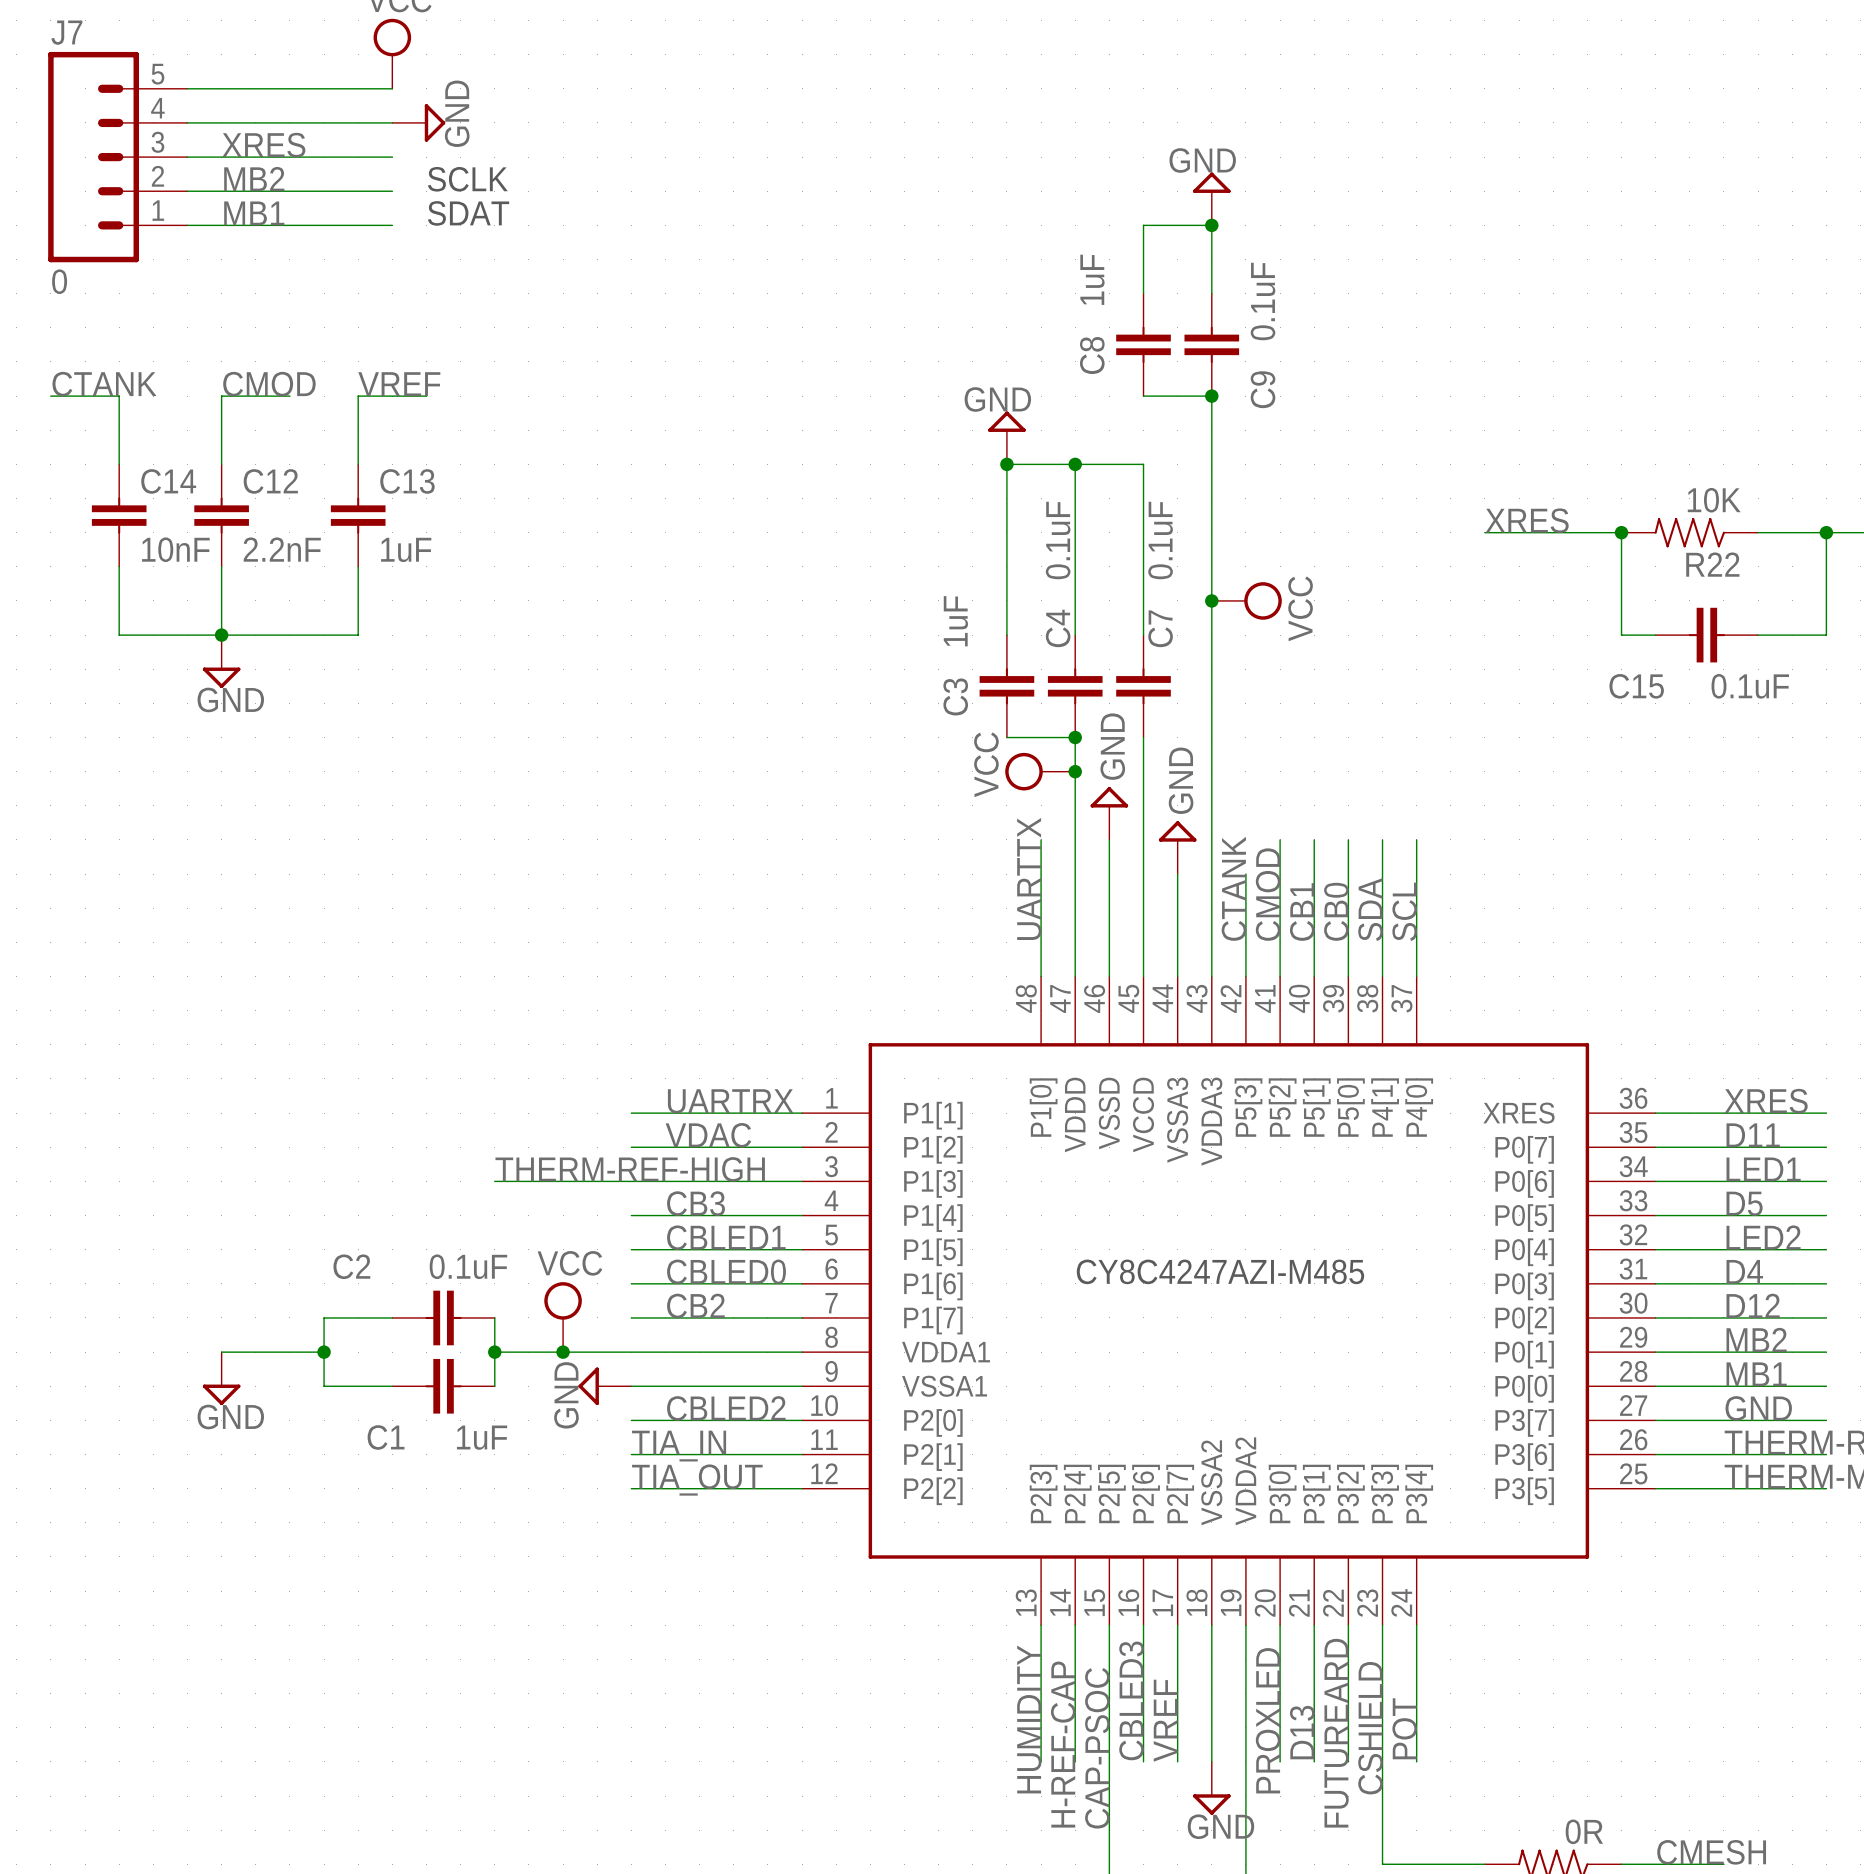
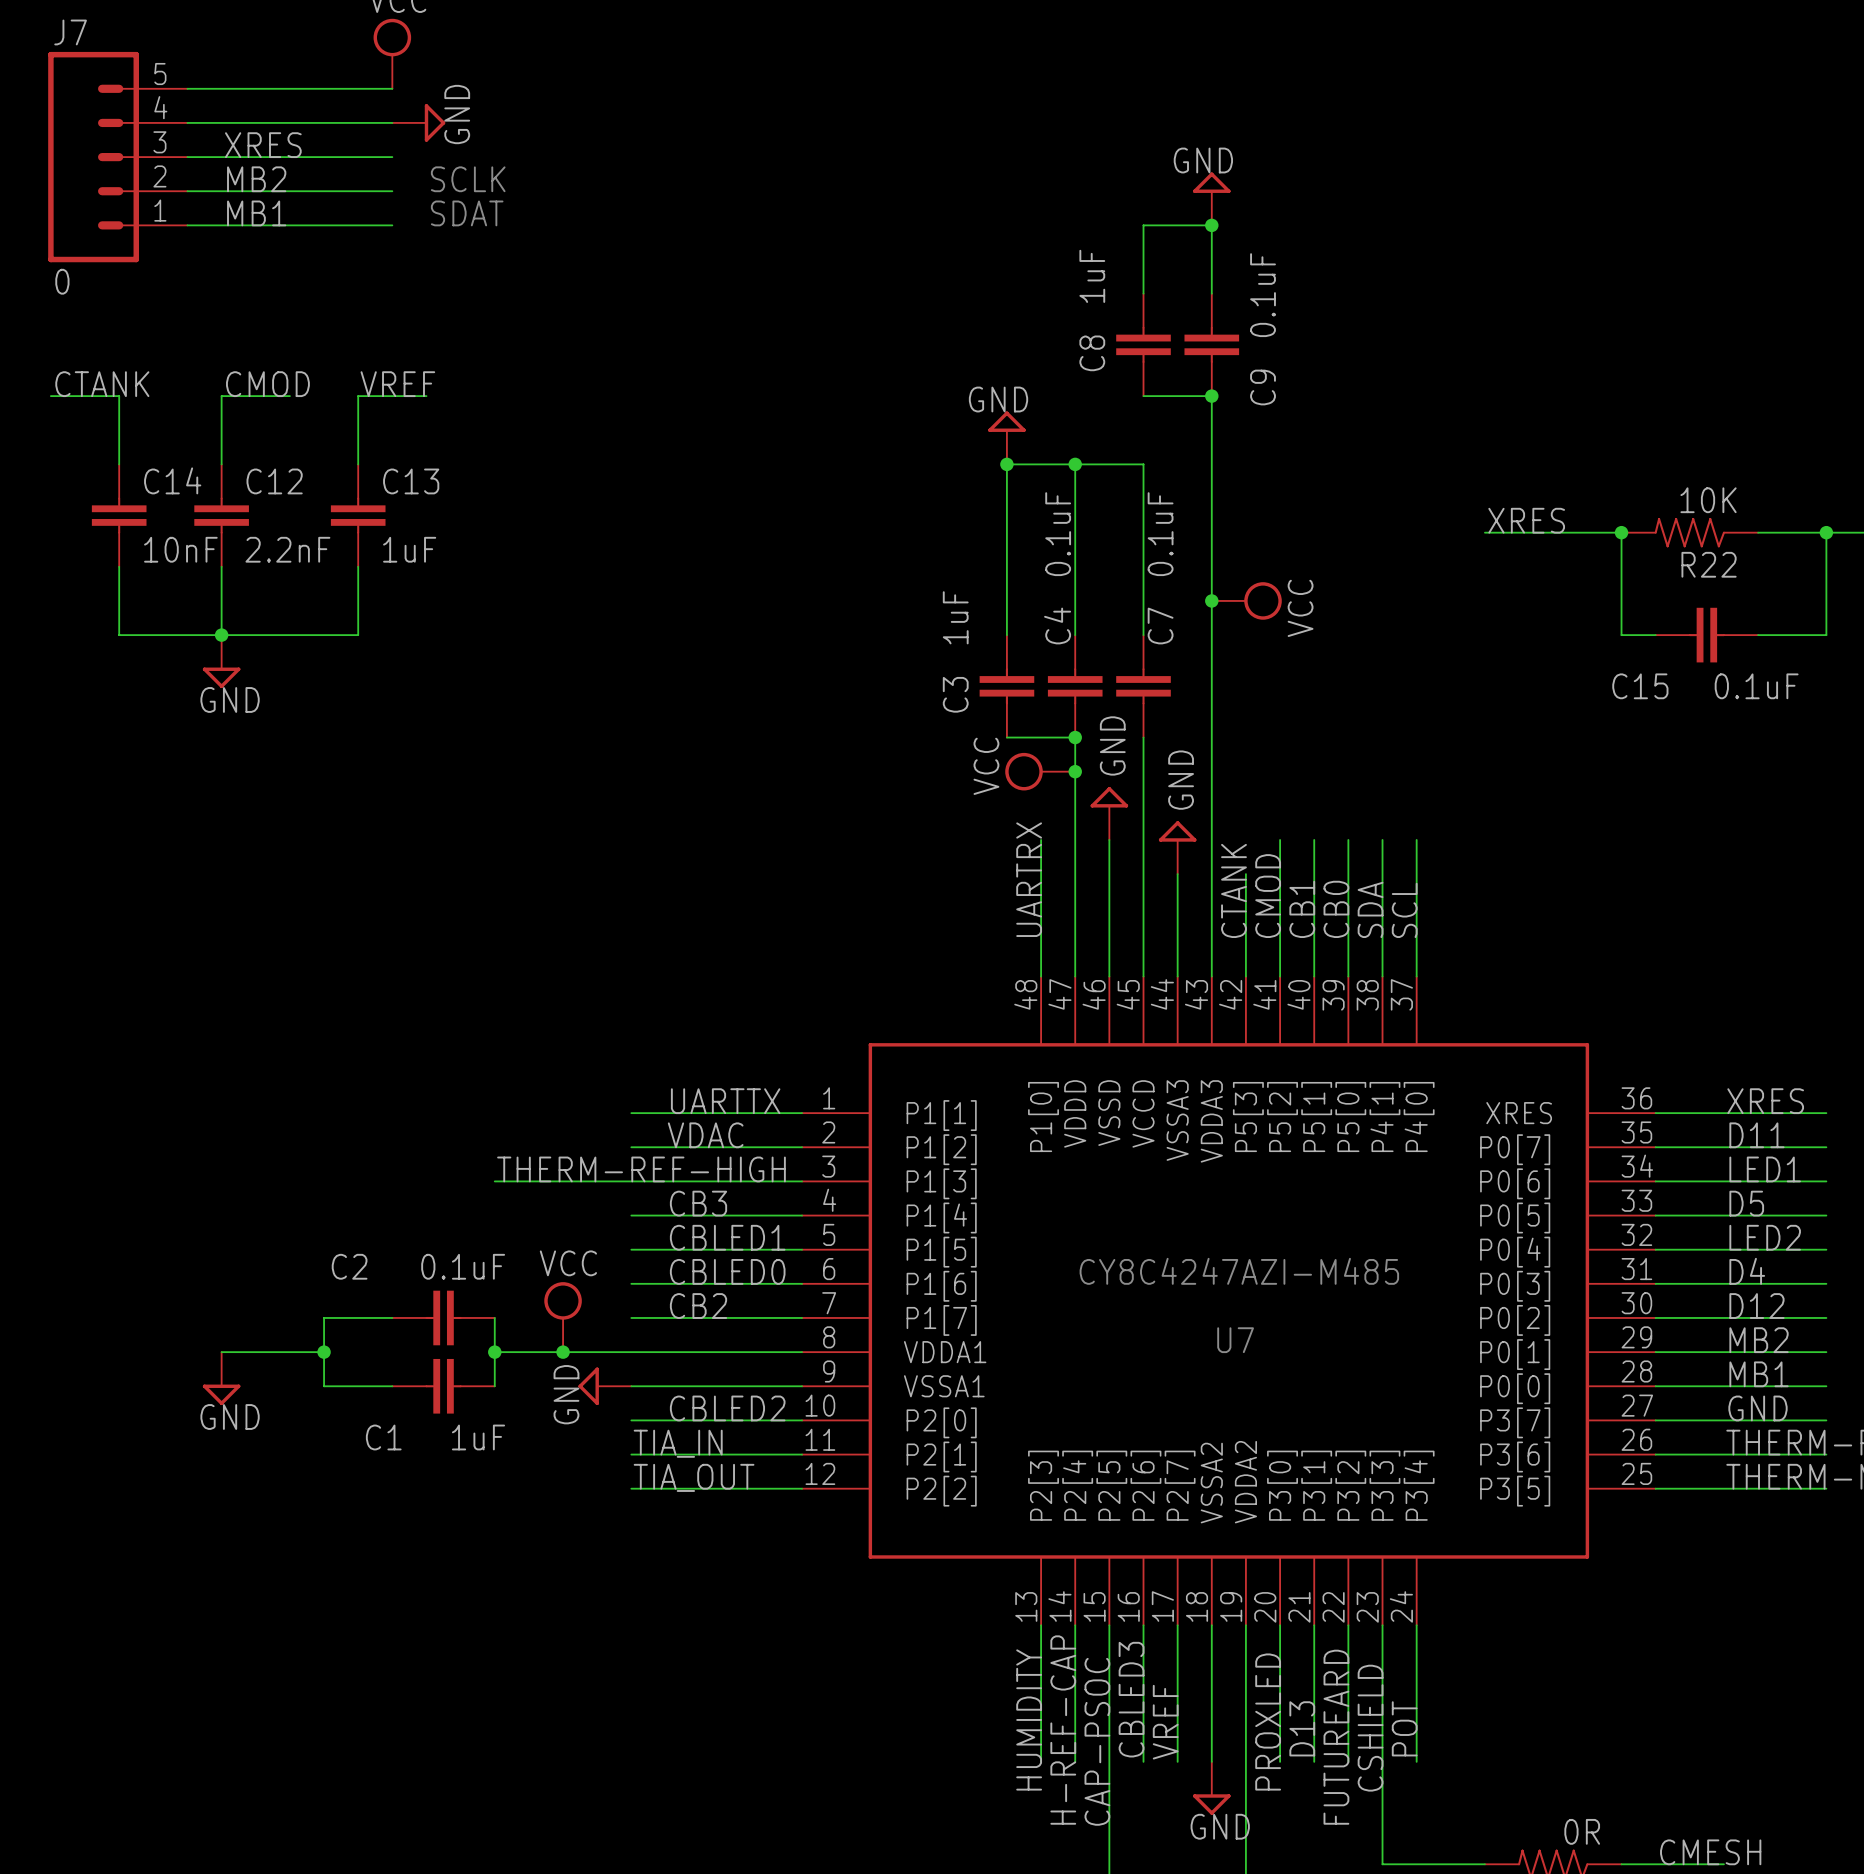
label: UARTTX (1029, 878) -> UARTRX (1029, 879)
label: UARTRX (730, 1101) -> UARTTX (725, 1101)
text: none -> U7 (1235, 1340)

